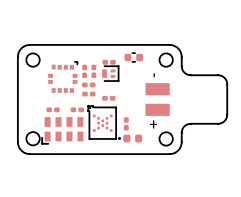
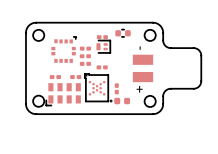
part: (84, 71) -> none
part: (93, 71) -> none
part: none -> (85, 48)

